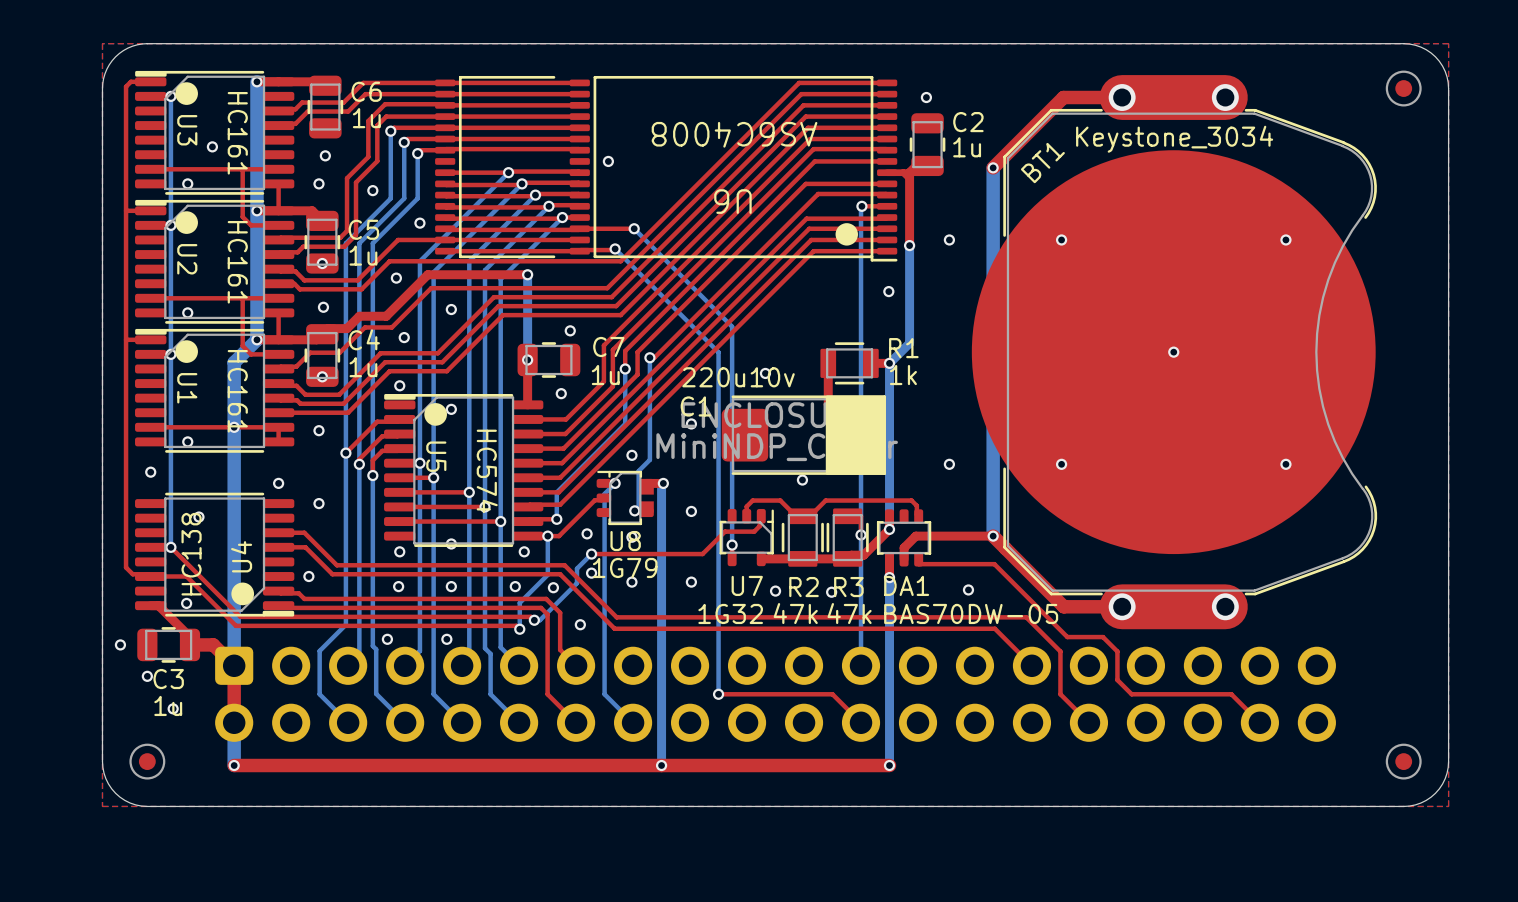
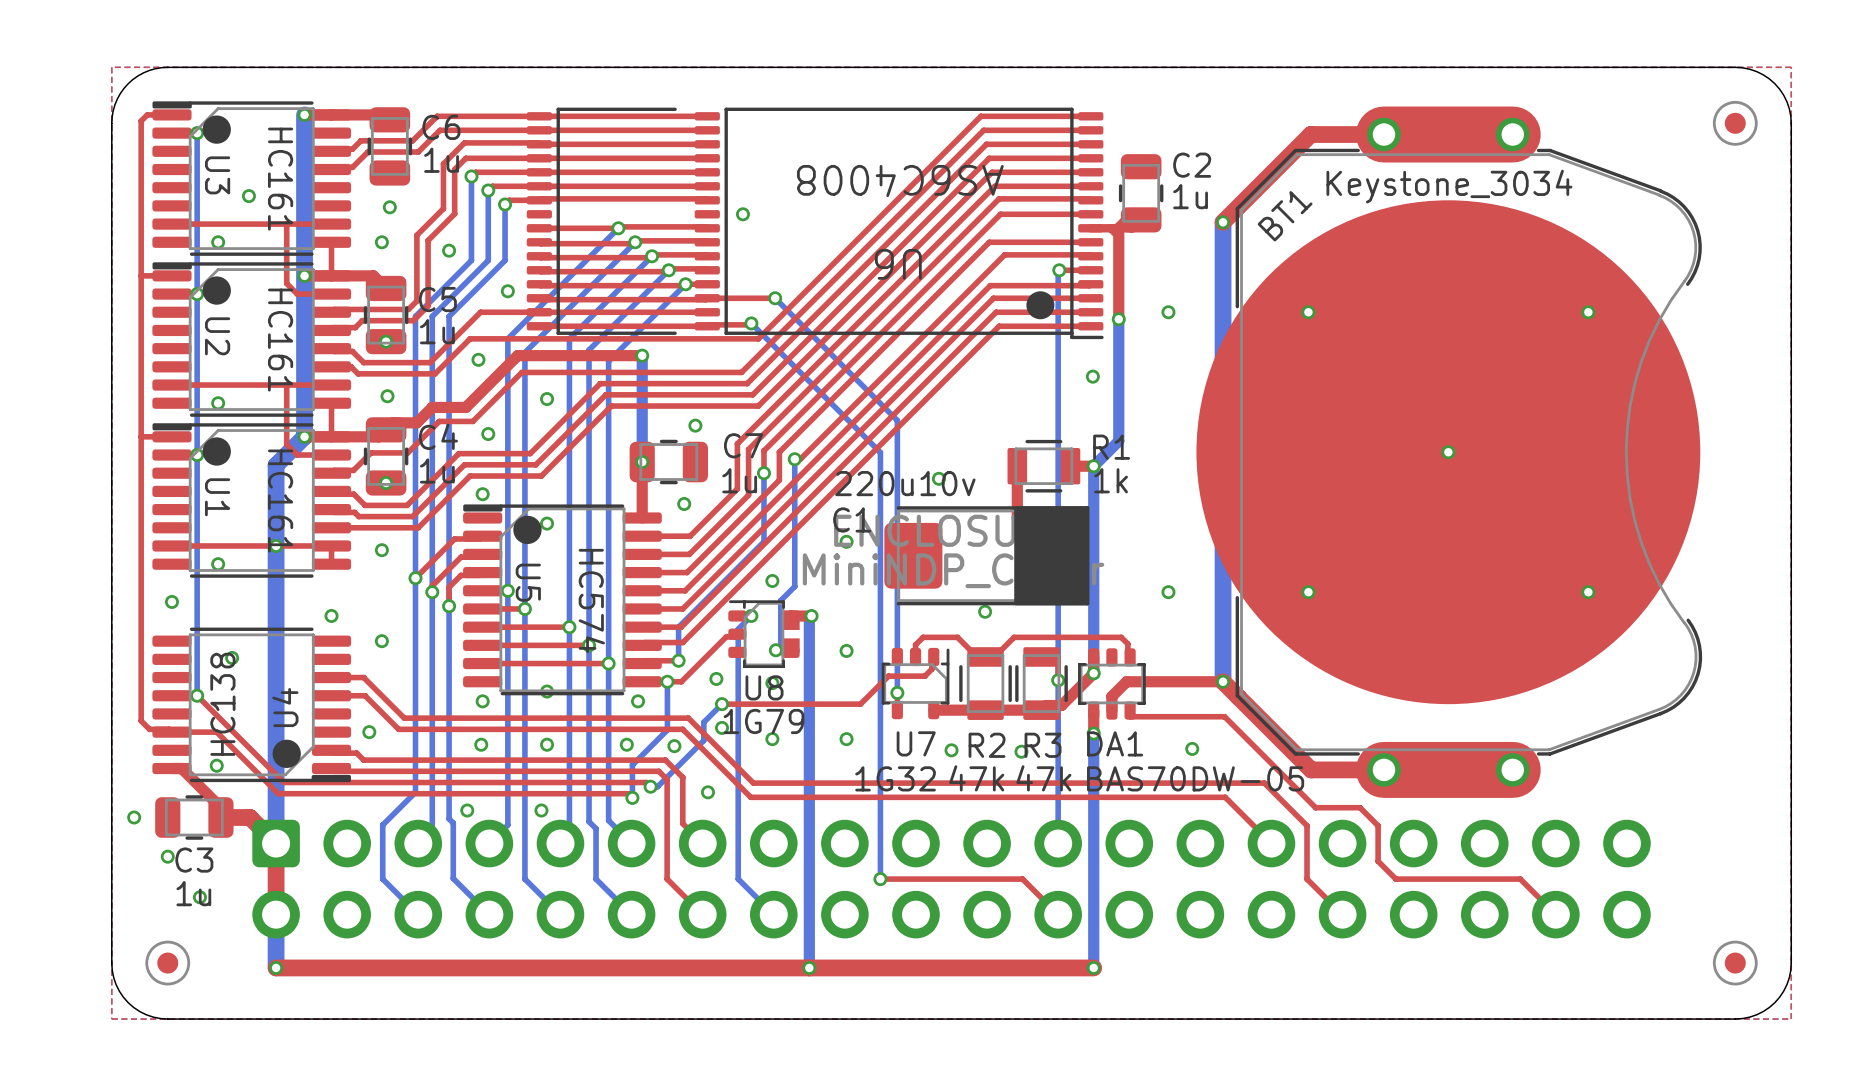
via: (926, 97) -> none

